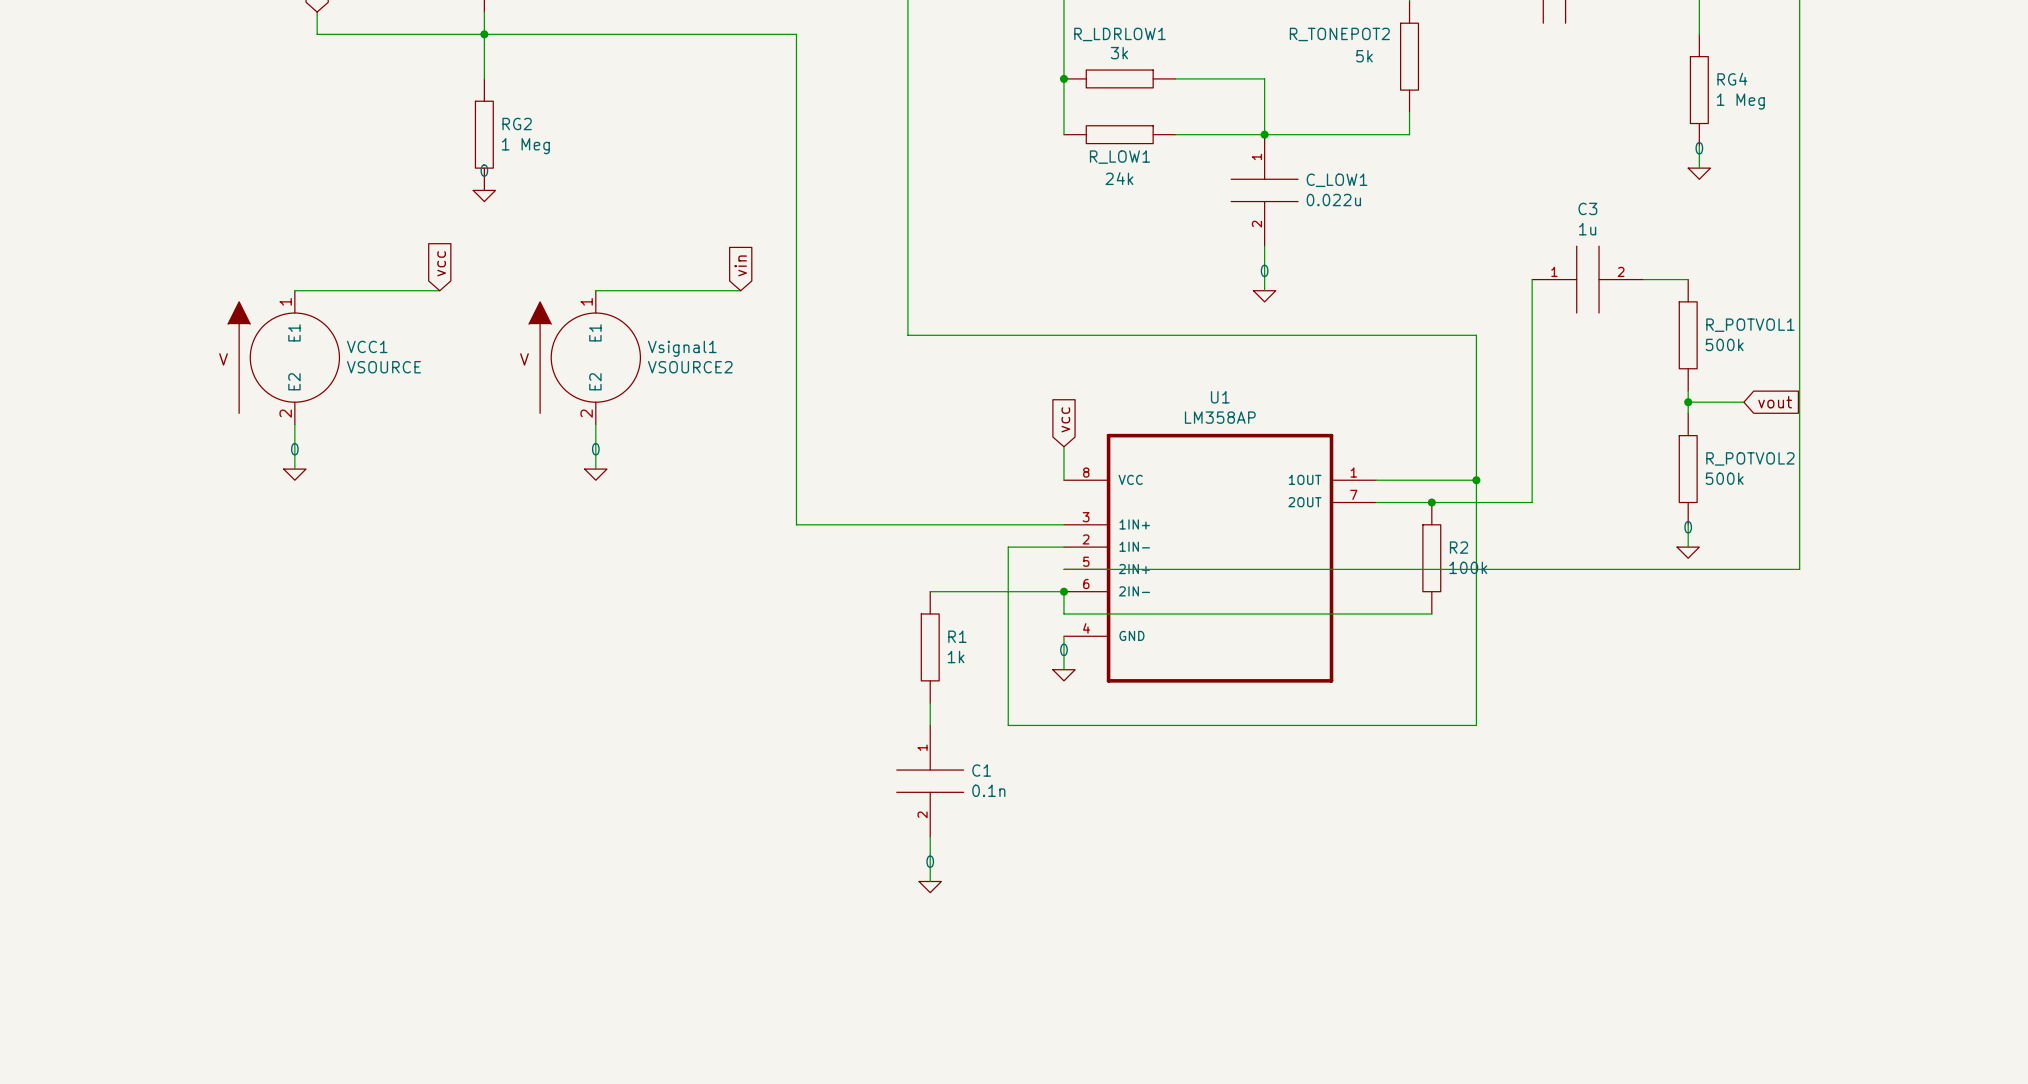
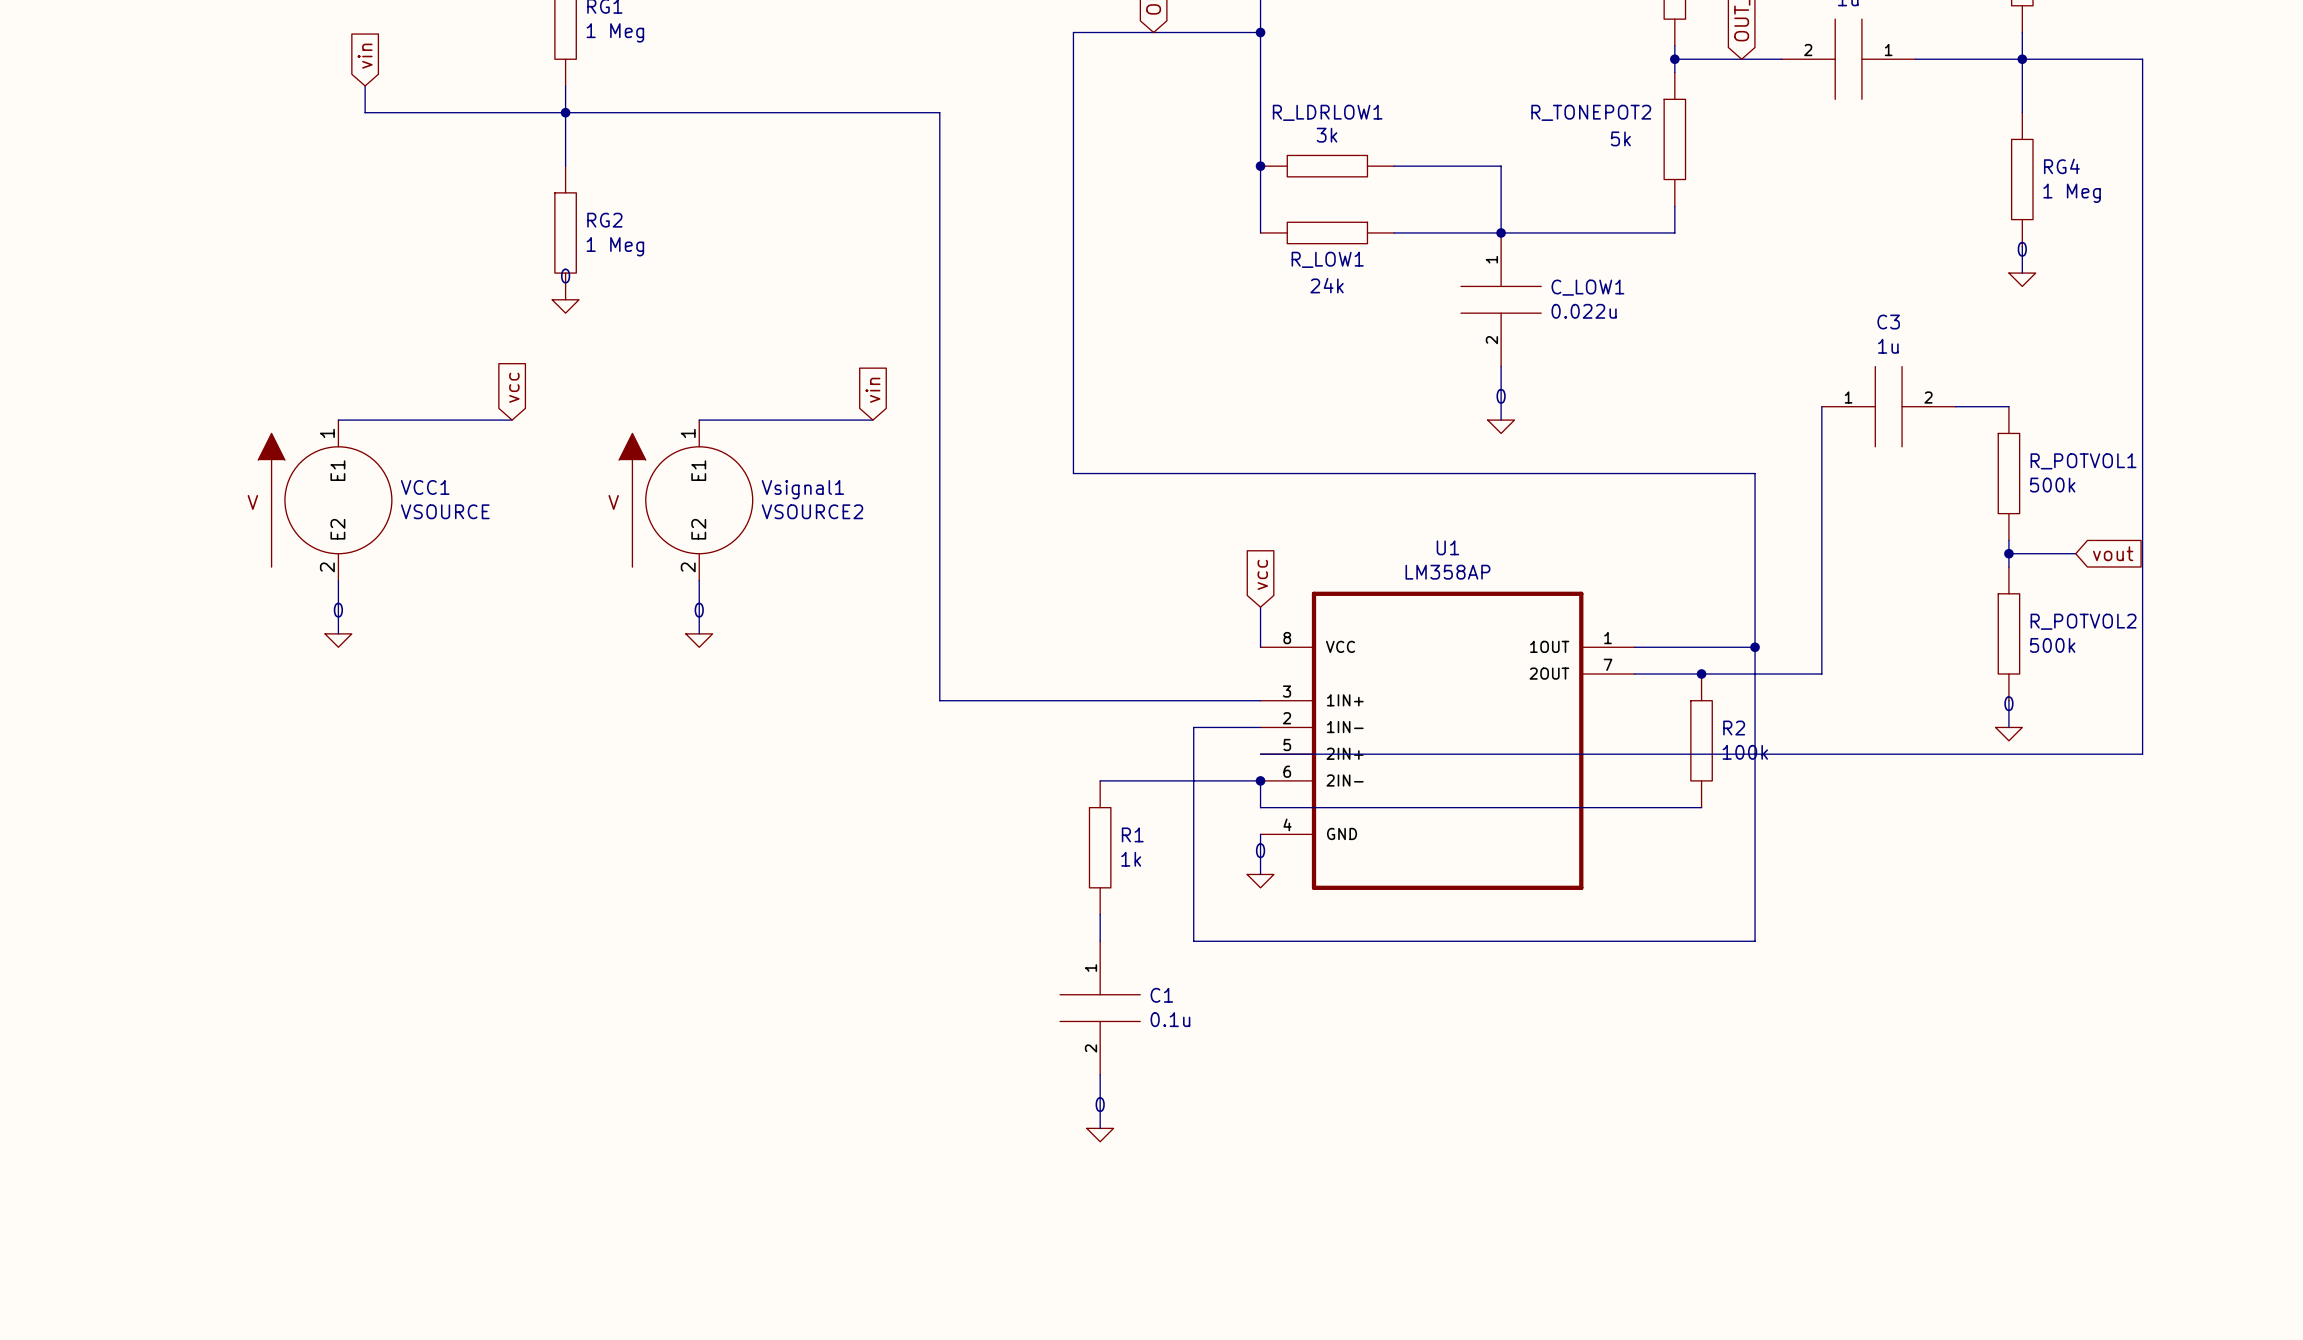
C1 value: 0.1n (988, 790) -> 0.1u (1170, 1019)

